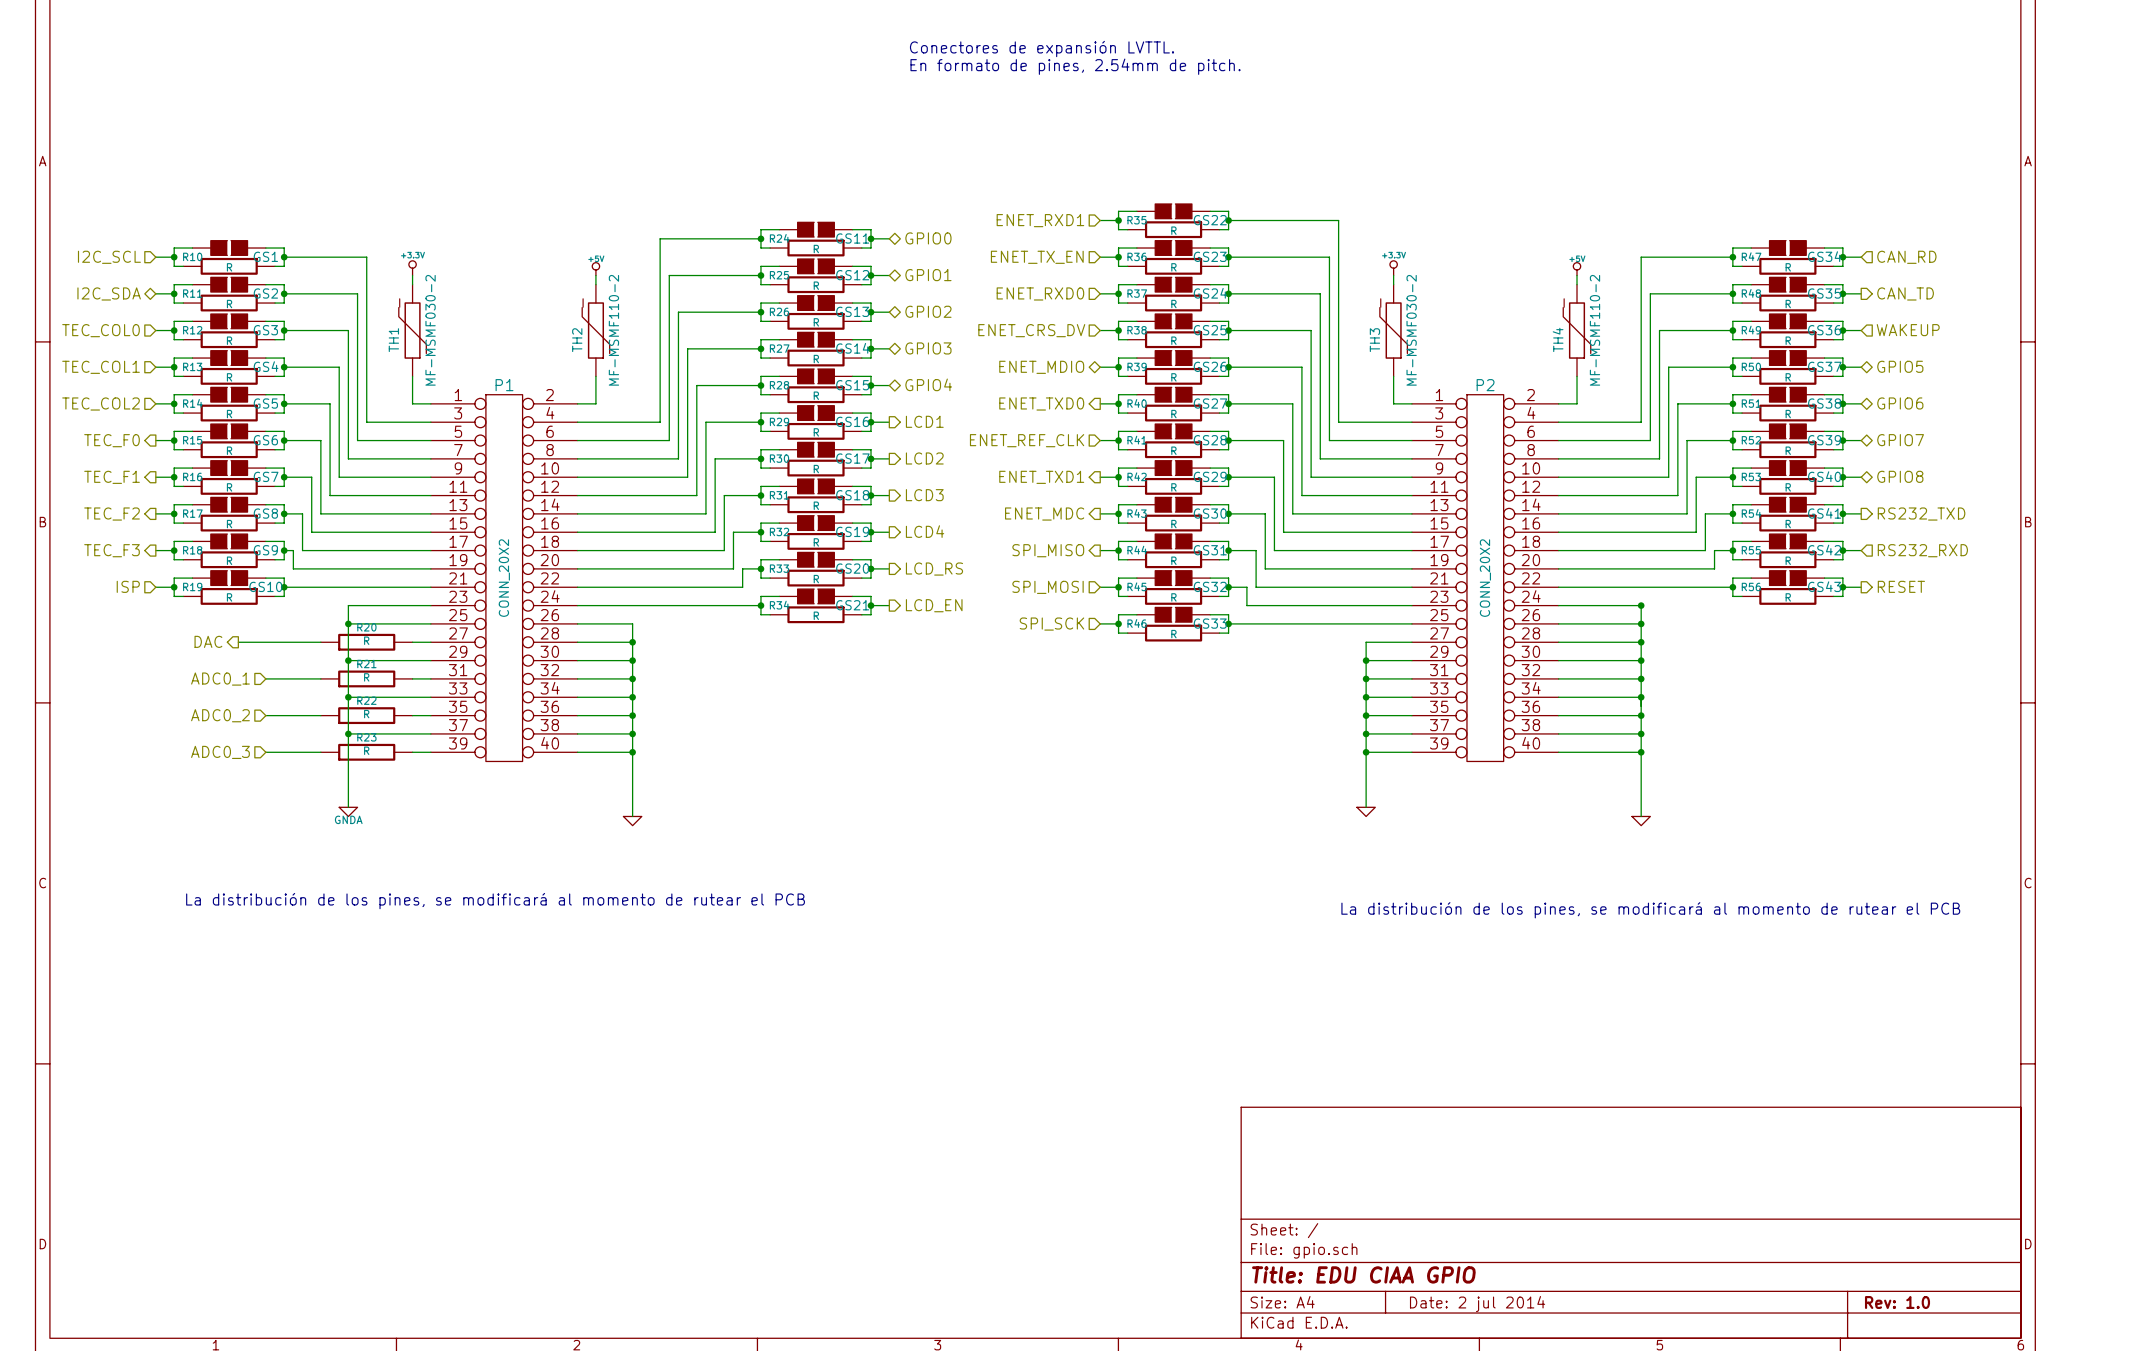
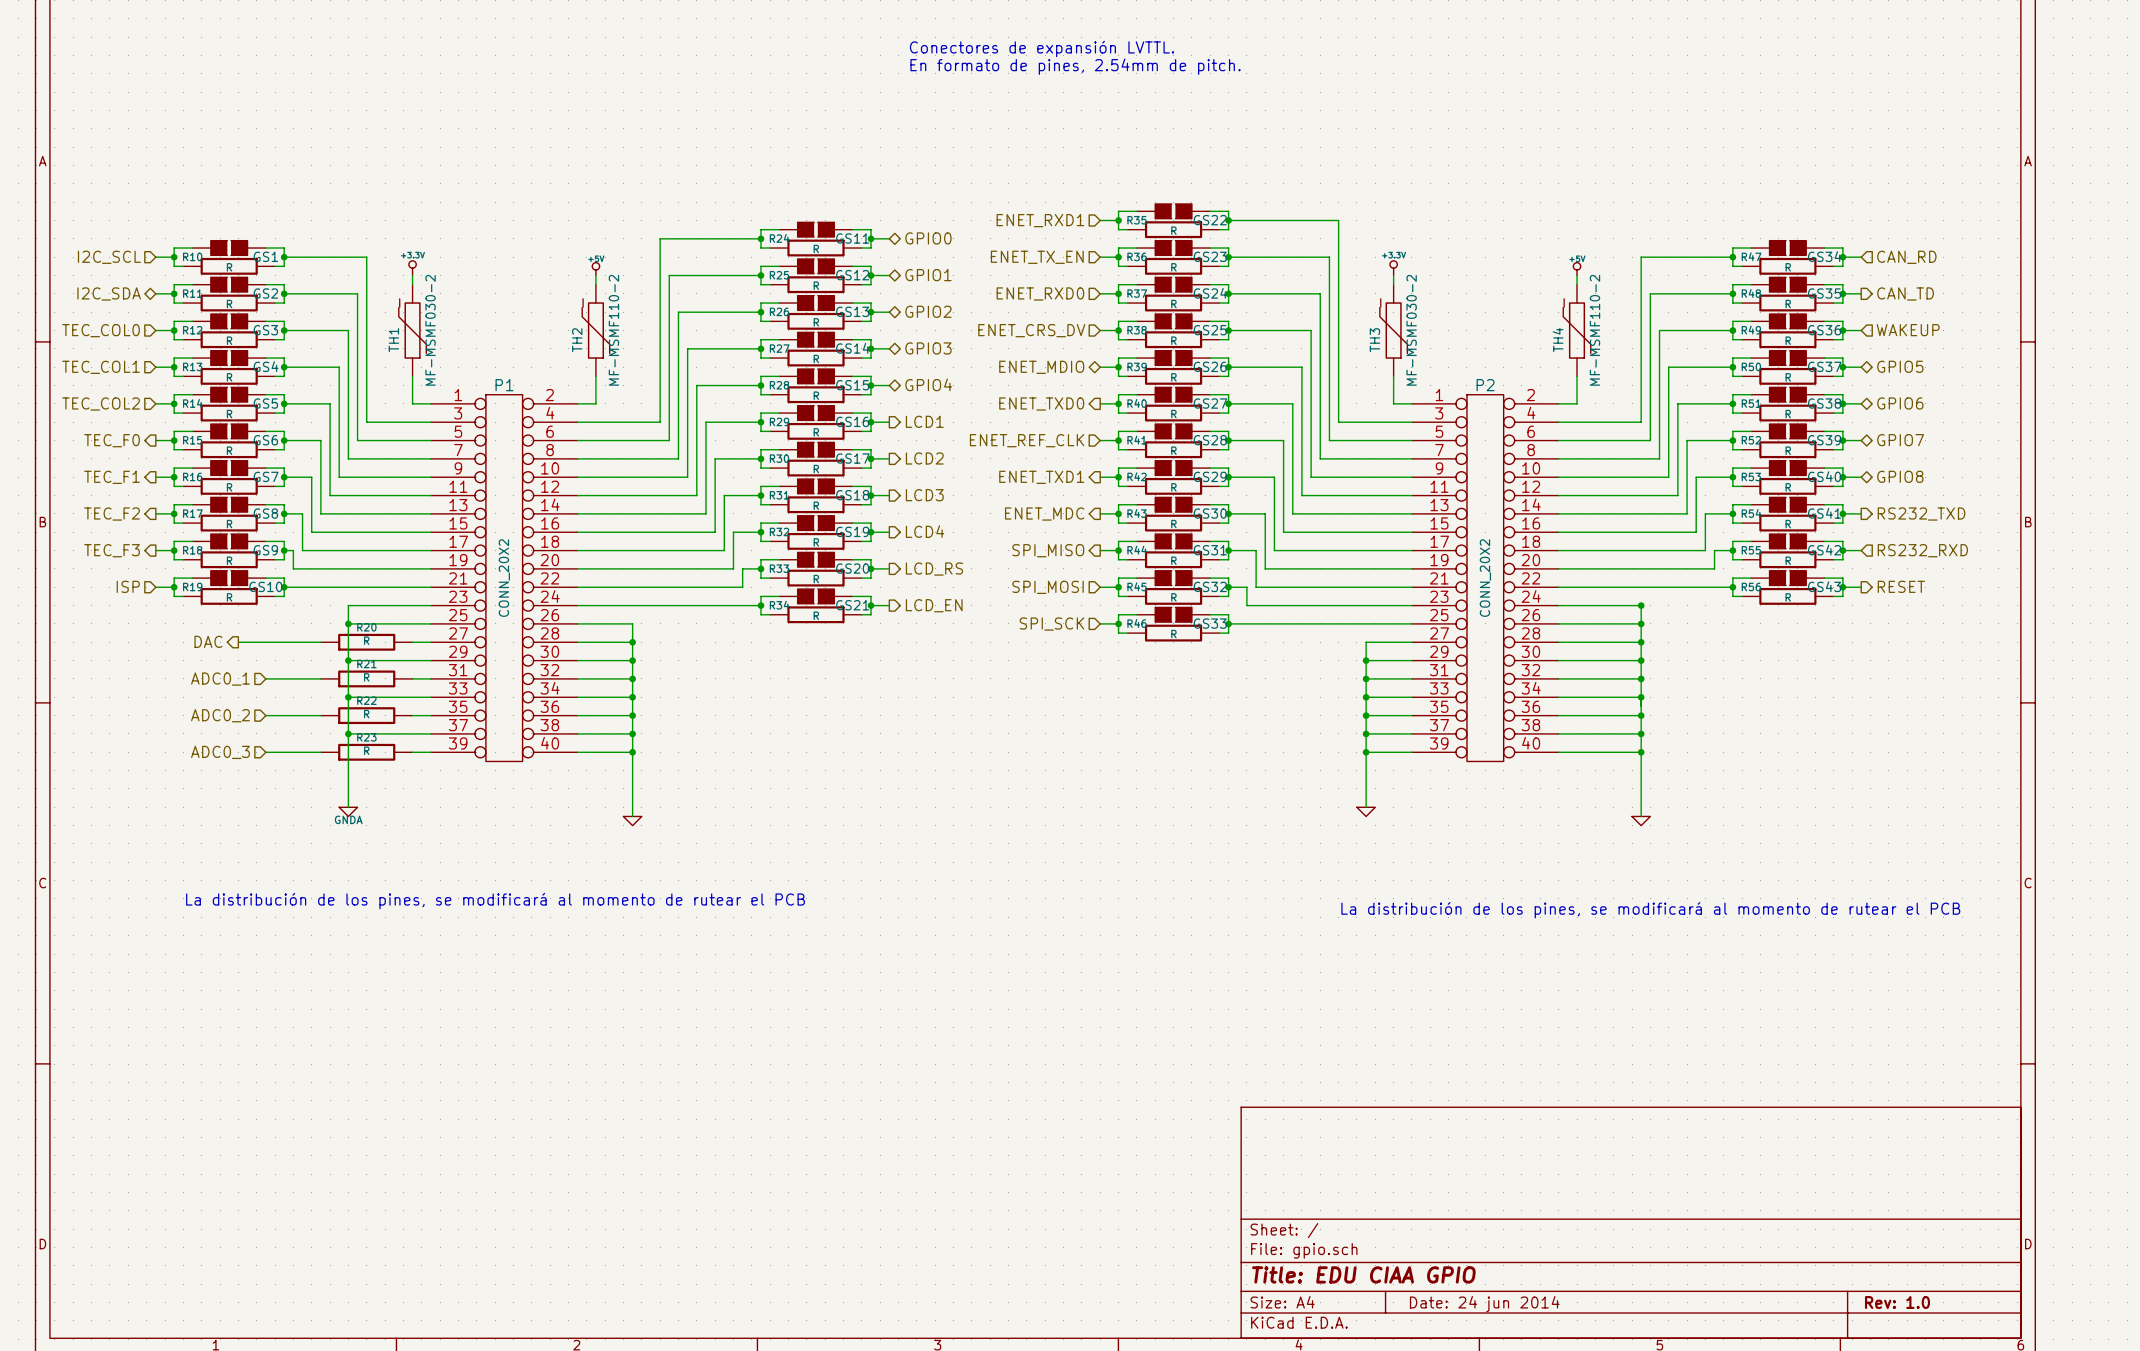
title block: Date: 2 jul 2014 (1477, 1304) -> Date: 24 jun 2014 (1484, 1304)

